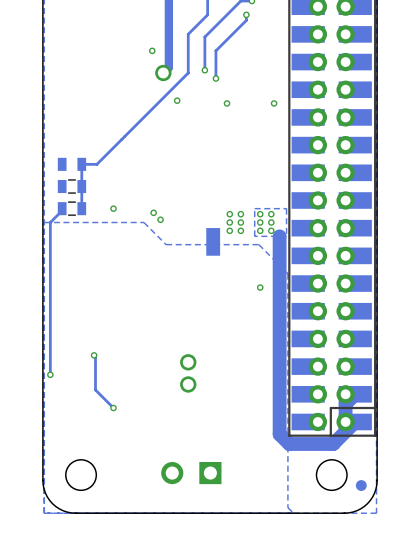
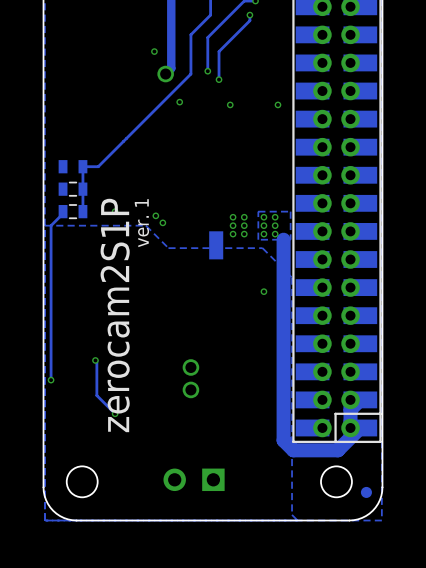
text: none -> ver. 1 (141, 223)
text: none -> zerocam2S1P (115, 315)

